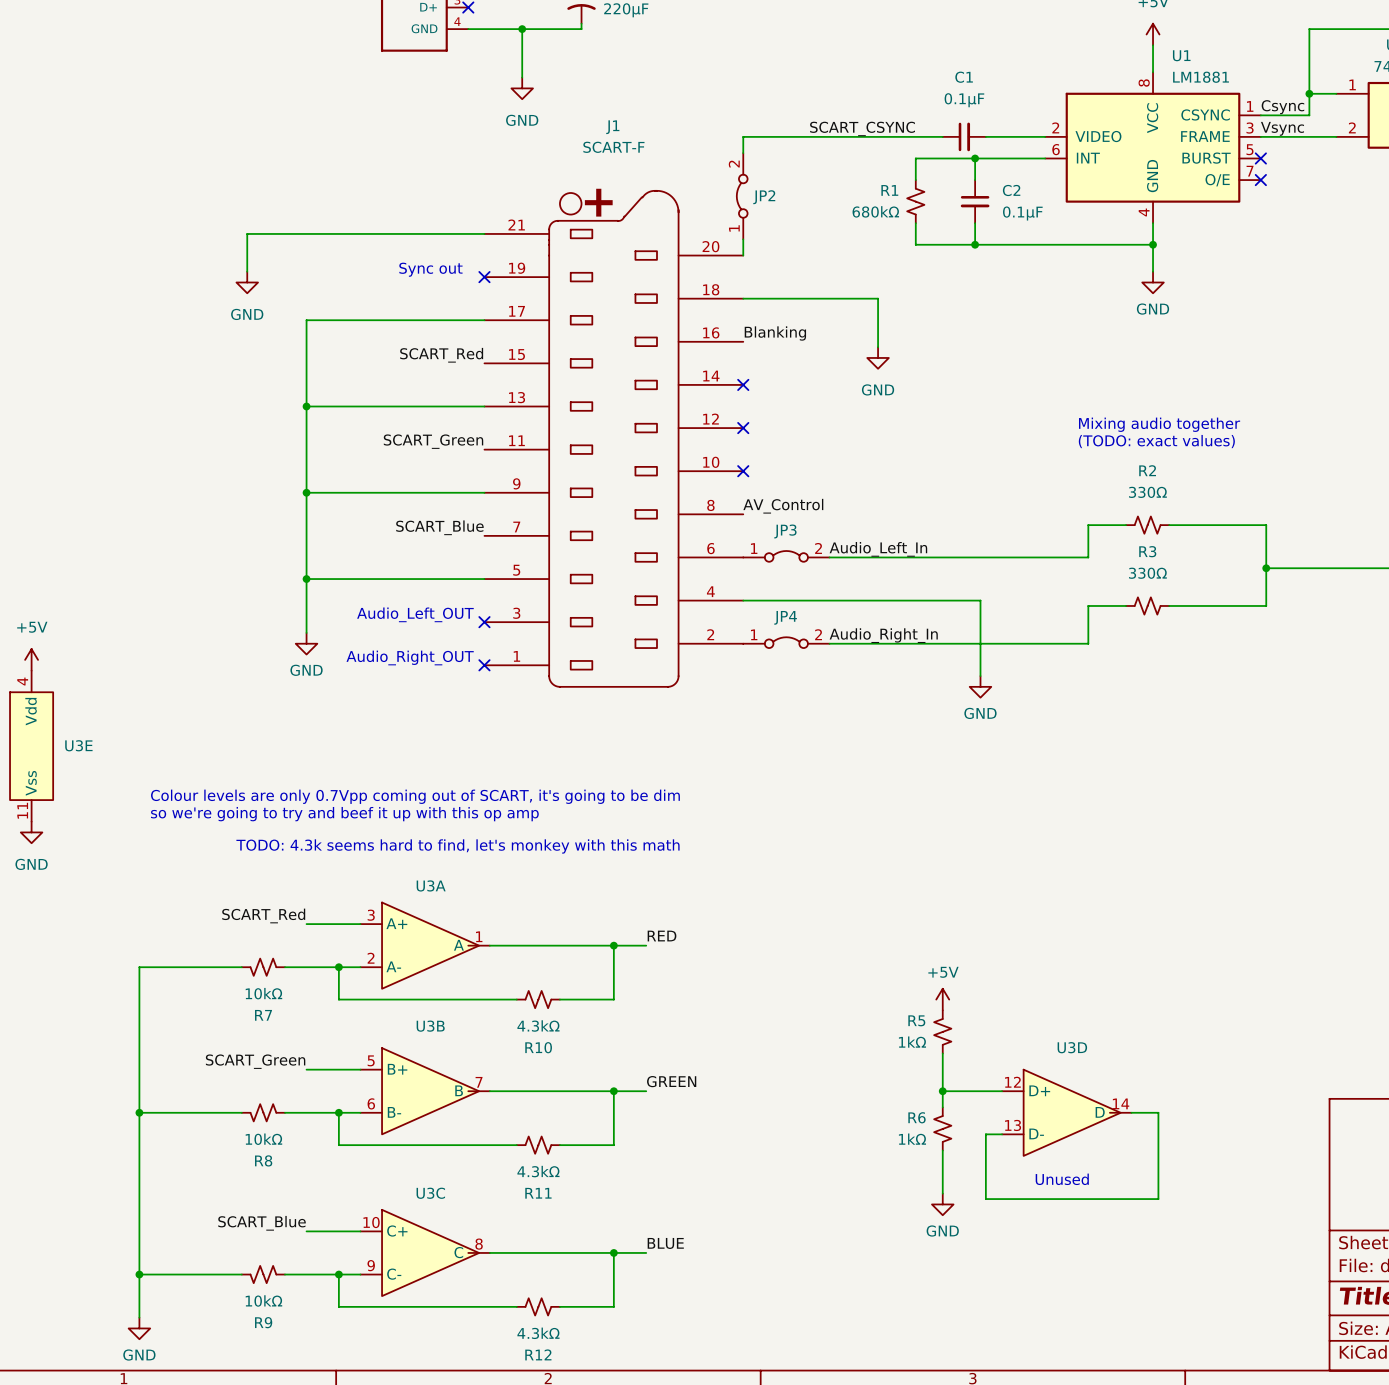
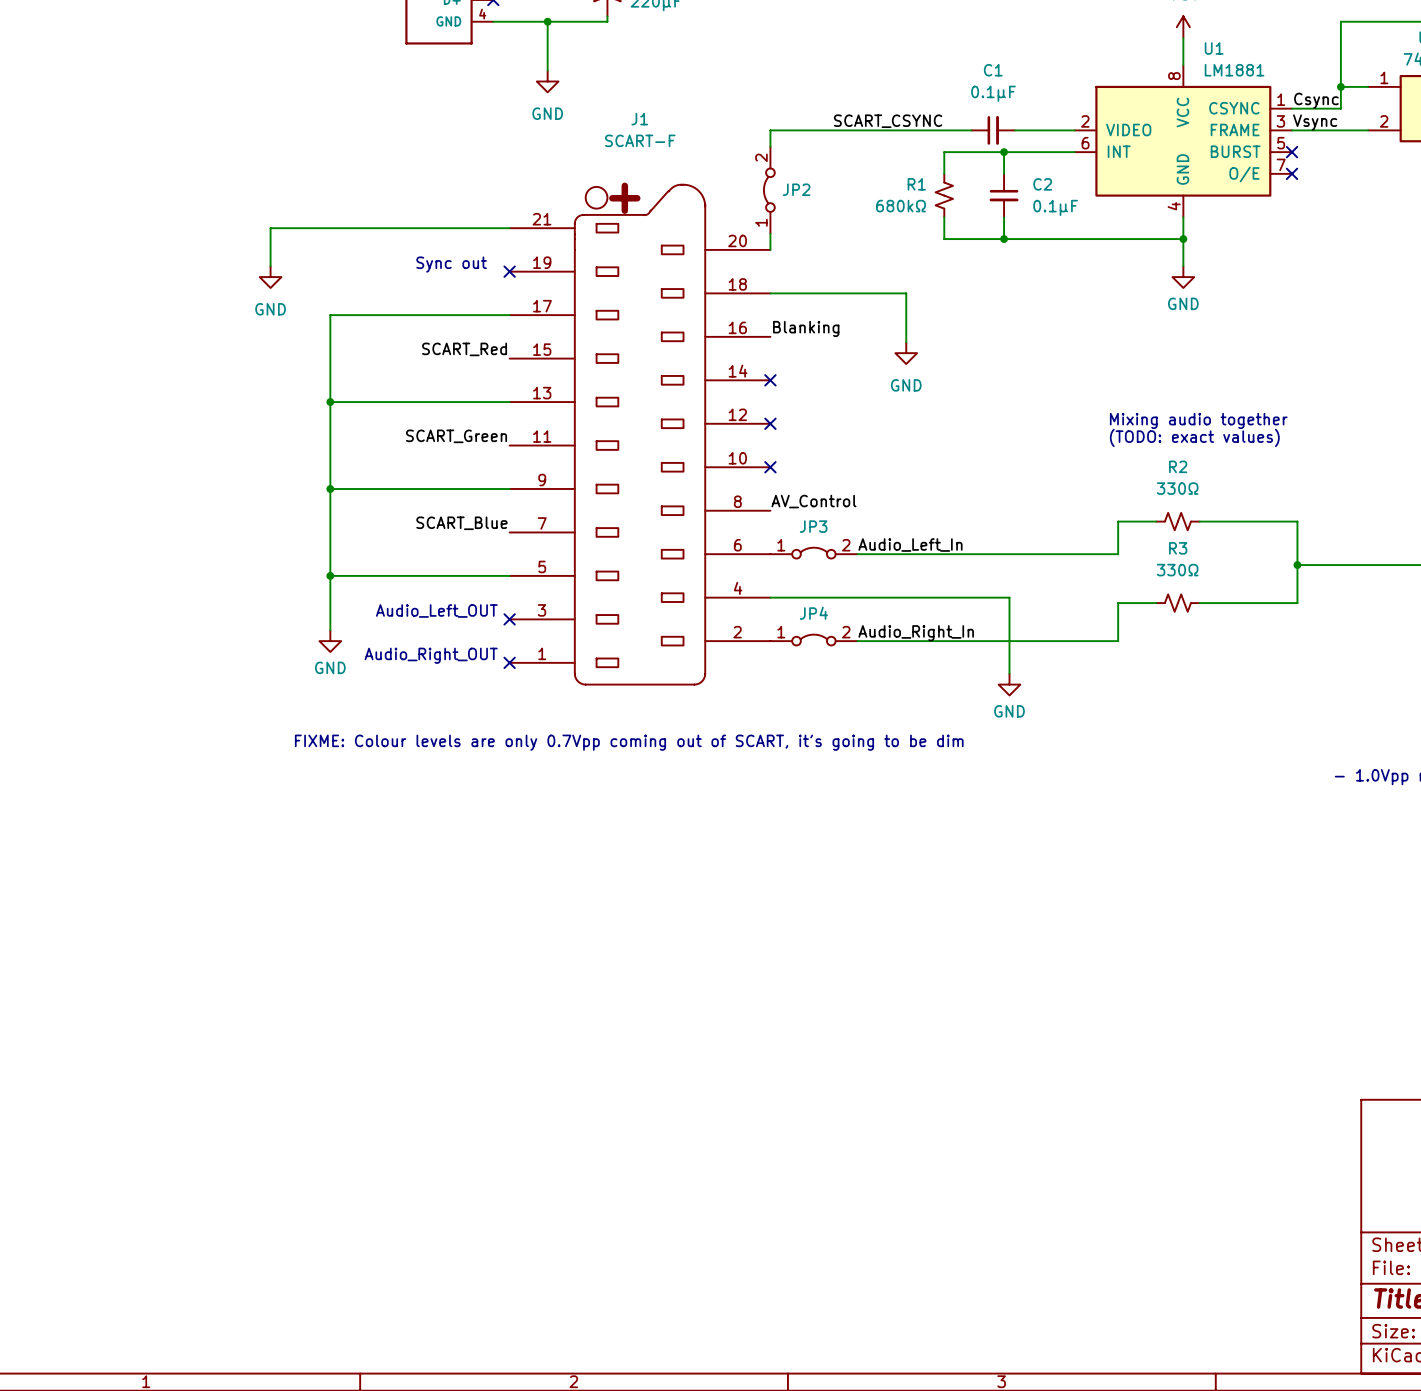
power symbol: +5V (31, 659) -> none
text: none -> FIXME: Colour levels are only 0.7Vpp coming out of SCART, it's going to be dim (629, 742)
U3E: (31, 746) -> none
text: Colour levels are only 0.7Vpp coming out of SCART, it's going to be dim (415, 796) -> none
text: so we're going to try and beef it up with this op amp (344, 814) -> none
power symbol: GND (31, 832) -> none
text: TODO: 4.3k seems hard to find, let's monkey with this math (458, 846) -> none
label: SCART_Red (263, 915) -> none
wire: (306, 924) (360, 924) -> none
label: RED (662, 936) -> none
U3A: (425, 945) -> none
wire: (489, 945) (646, 945) -> none
wire: (613, 945) (613, 999) (559, 999) -> none
junction: (613, 945) -> none
wire: (241, 967) (139, 967) (139, 1317) -> none
R7: 10kΩ (263, 967) -> none
wire: (284, 967) (360, 967) -> none
wire: (338, 967) (338, 999) (516, 999) -> none
junction: (338, 967) -> none
R10: 4.3kΩ (538, 999) -> none
power symbol: +5V (942, 999) -> none
R5: 1kΩ (942, 1031) -> none
wire: (942, 1053) (942, 1107) -> none
label: SCART_Green (255, 1061) -> none
wire: (306, 1069) (360, 1069) -> none
label: GREEN (671, 1081) -> none
U3B: (425, 1091) -> none
wire: (489, 1091) (646, 1091) -> none
wire: (613, 1091) (613, 1145) (559, 1145) -> none
junction: (613, 1091) -> none
wire: (942, 1091) (1002, 1091) -> none
junction: (942, 1091) -> none
wire: (139, 1112) (241, 1112) -> none
junction: (139, 1112) -> none
R8: 10kΩ (263, 1112) -> none
wire: (284, 1112) (360, 1112) -> none
wire: (338, 1112) (338, 1145) (516, 1145) -> none
junction: (338, 1112) -> none
U3D: (1066, 1112) -> none
wire: (1131, 1112) (1158, 1112) (1158, 1199) (985, 1199) (985, 1134) (1002, 1134) -> none
R6: 1kΩ (942, 1128) -> none
R11: 4.3kΩ (538, 1145) -> none
wire: (942, 1150) (942, 1193) -> none
text: Unused (1062, 1179) -> none
power symbol: GND (942, 1204) -> none
label: SCART_Blue (262, 1223) -> none
wire: (306, 1231) (360, 1231) -> none
label: BLUE (665, 1243) -> none
U3C: (425, 1252) -> none
wire: (489, 1252) (646, 1252) -> none
wire: (613, 1252) (613, 1306) (559, 1306) -> none
junction: (613, 1252) -> none
wire: (139, 1274) (241, 1274) -> none
junction: (139, 1274) -> none
R9: 10kΩ (263, 1274) -> none
wire: (284, 1274) (360, 1274) -> none
wire: (338, 1274) (338, 1306) (516, 1306) -> none
junction: (338, 1274) -> none
R12: 4.3kΩ (538, 1306) -> none
power symbol: GND (139, 1328) -> none

